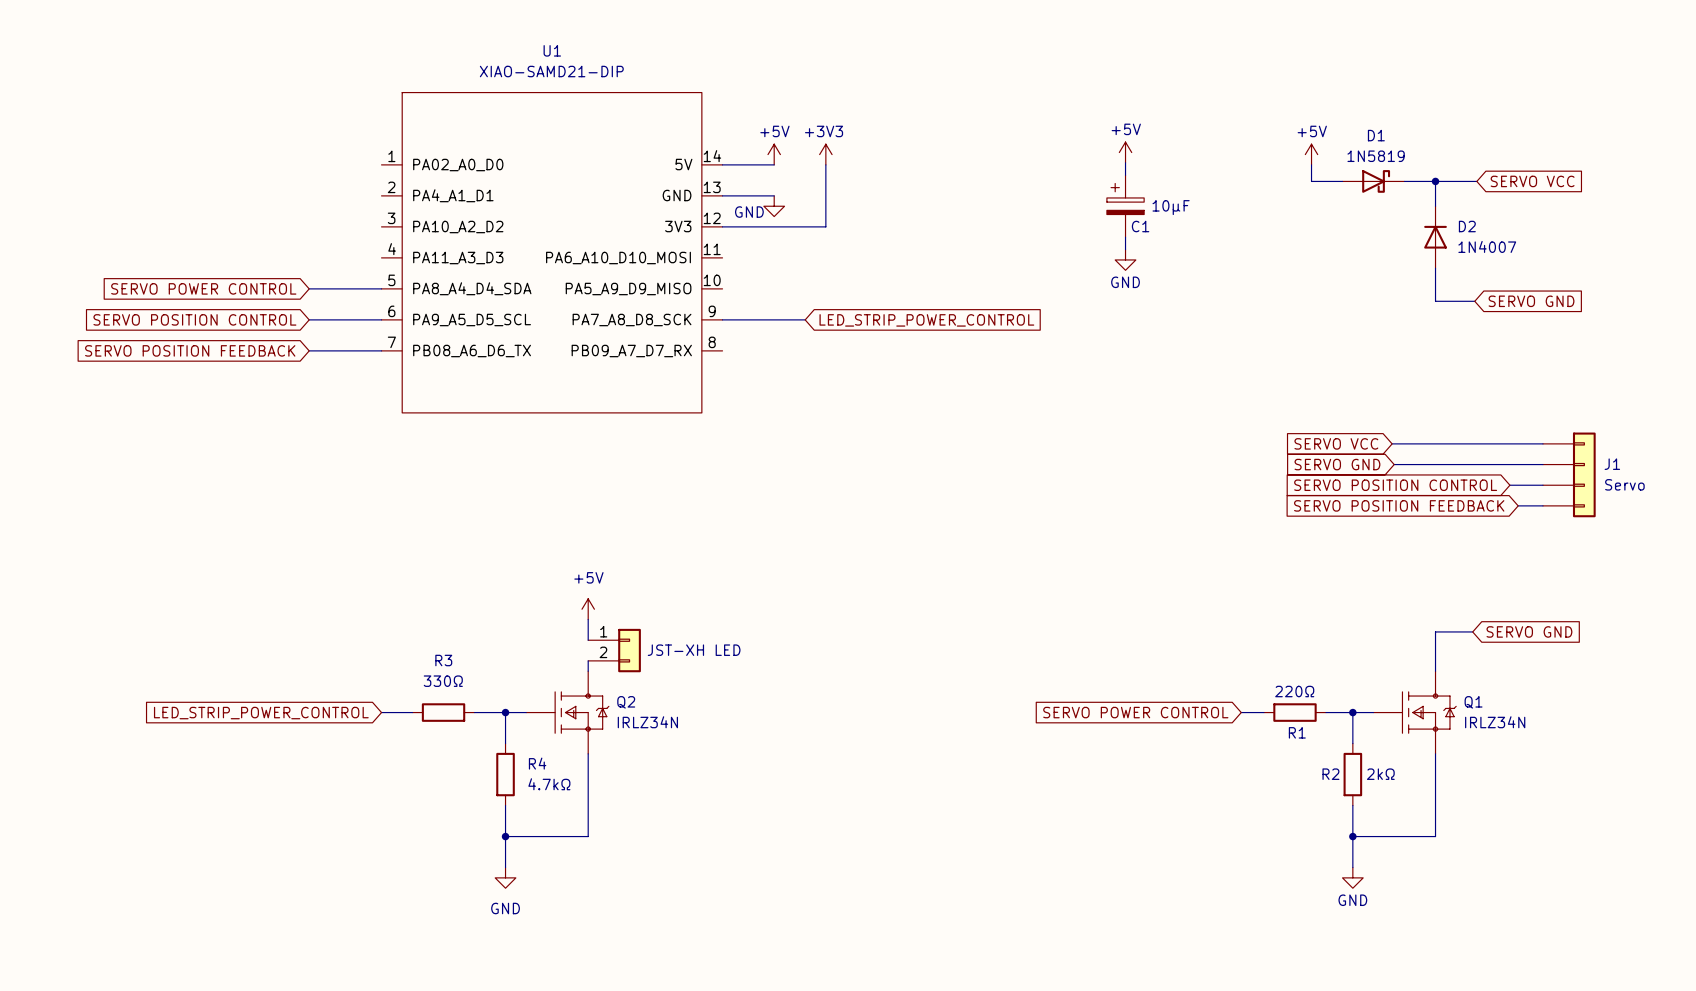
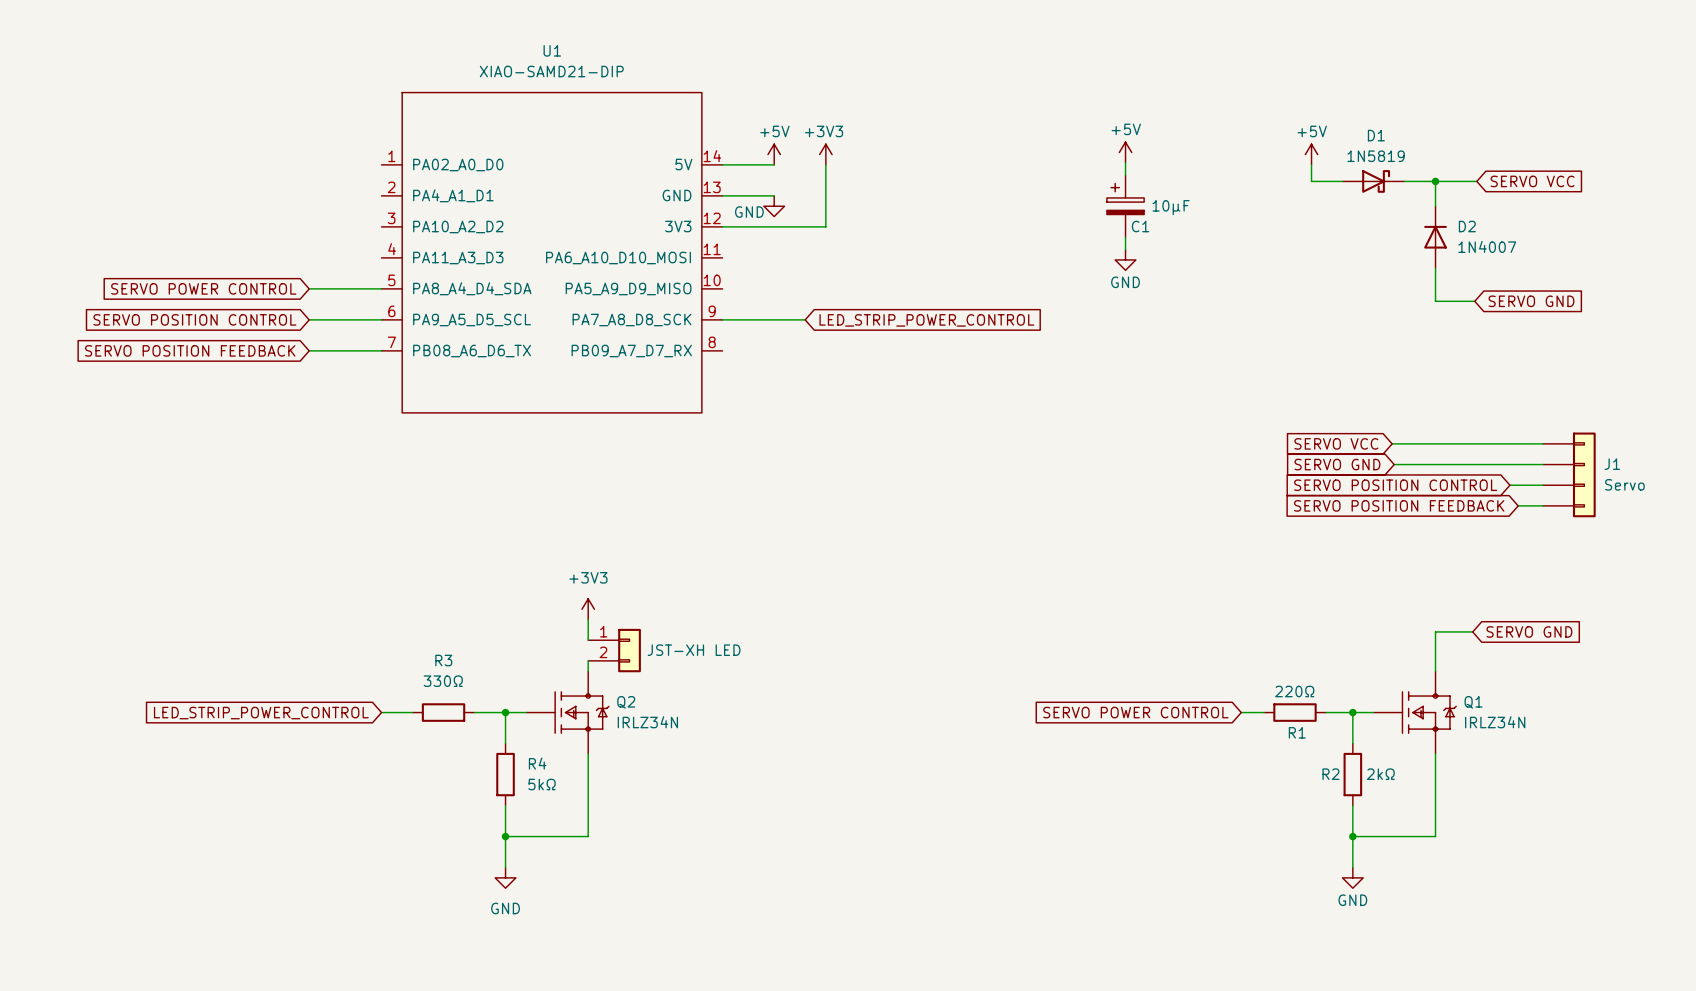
power symbol: +5V (588, 609) -> +3V3 (588, 609)
R4 value: 4.7kΩ (549, 784) -> 5kΩ (542, 784)

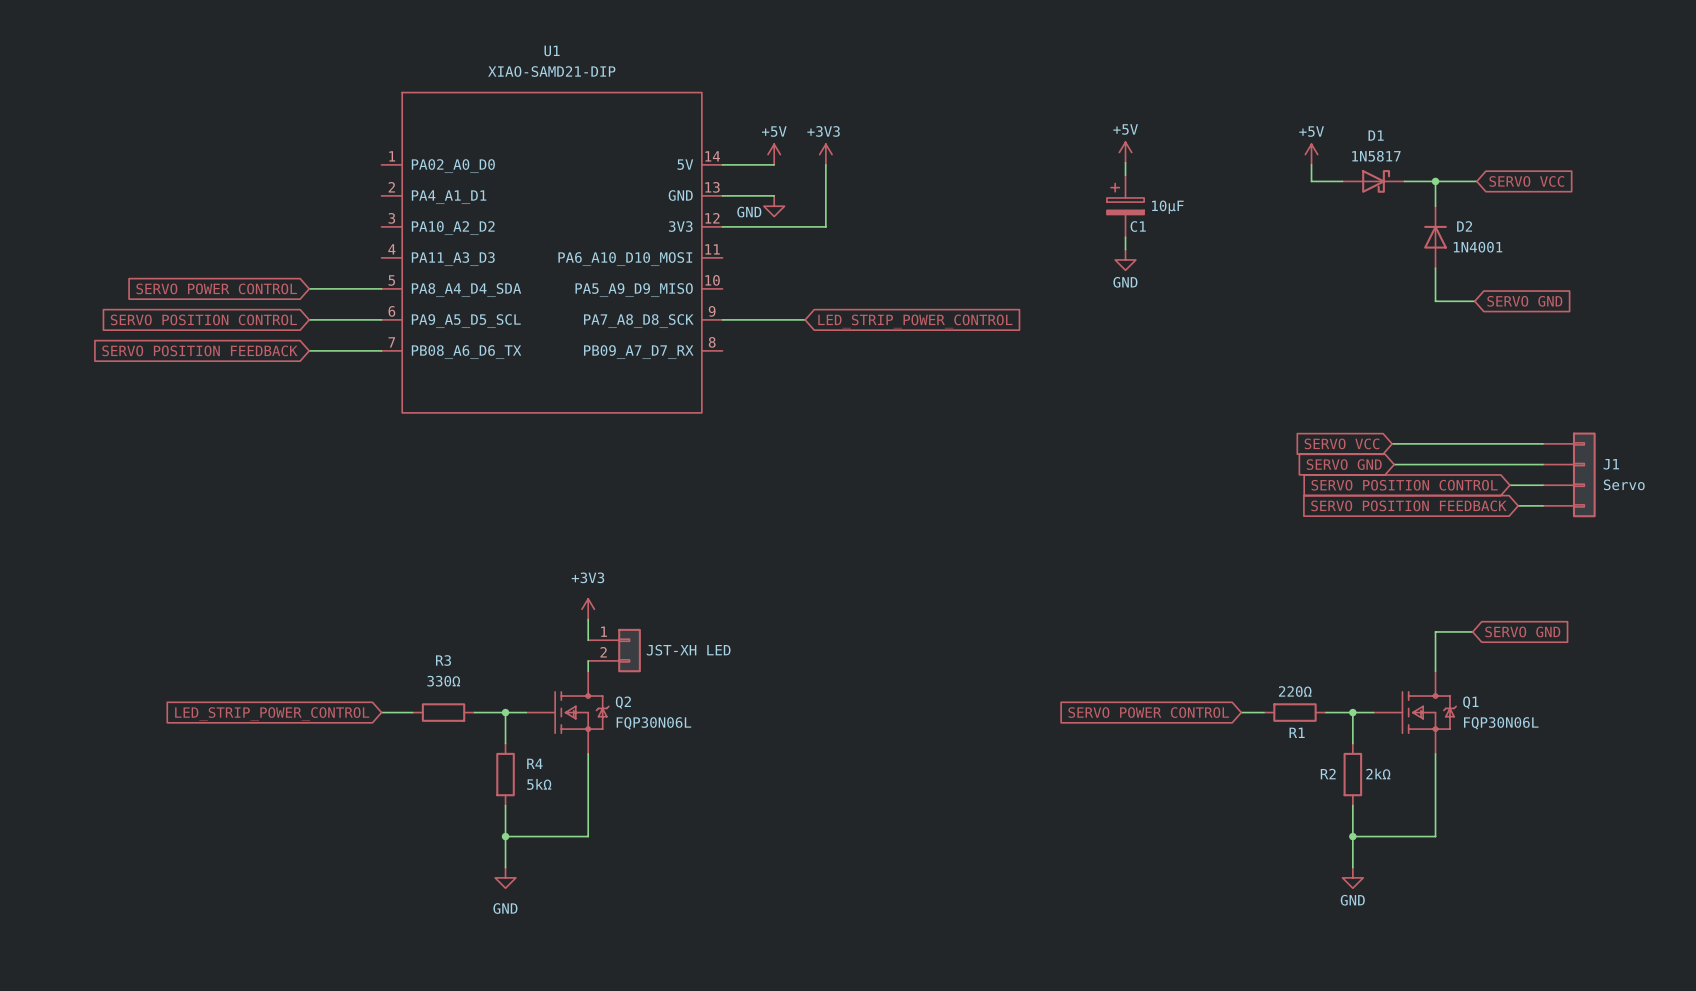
D1 value: 1N5819 (1376, 156) -> 1N5817 (1376, 156)
D2 value: 1N4007 (1487, 246) -> 1N4001 (1478, 247)
Q2 value: IRLZ34N (647, 722) -> FQP30N06L (653, 723)
Q1 value: IRLZ34N (1495, 722) -> FQP30N06L (1501, 723)

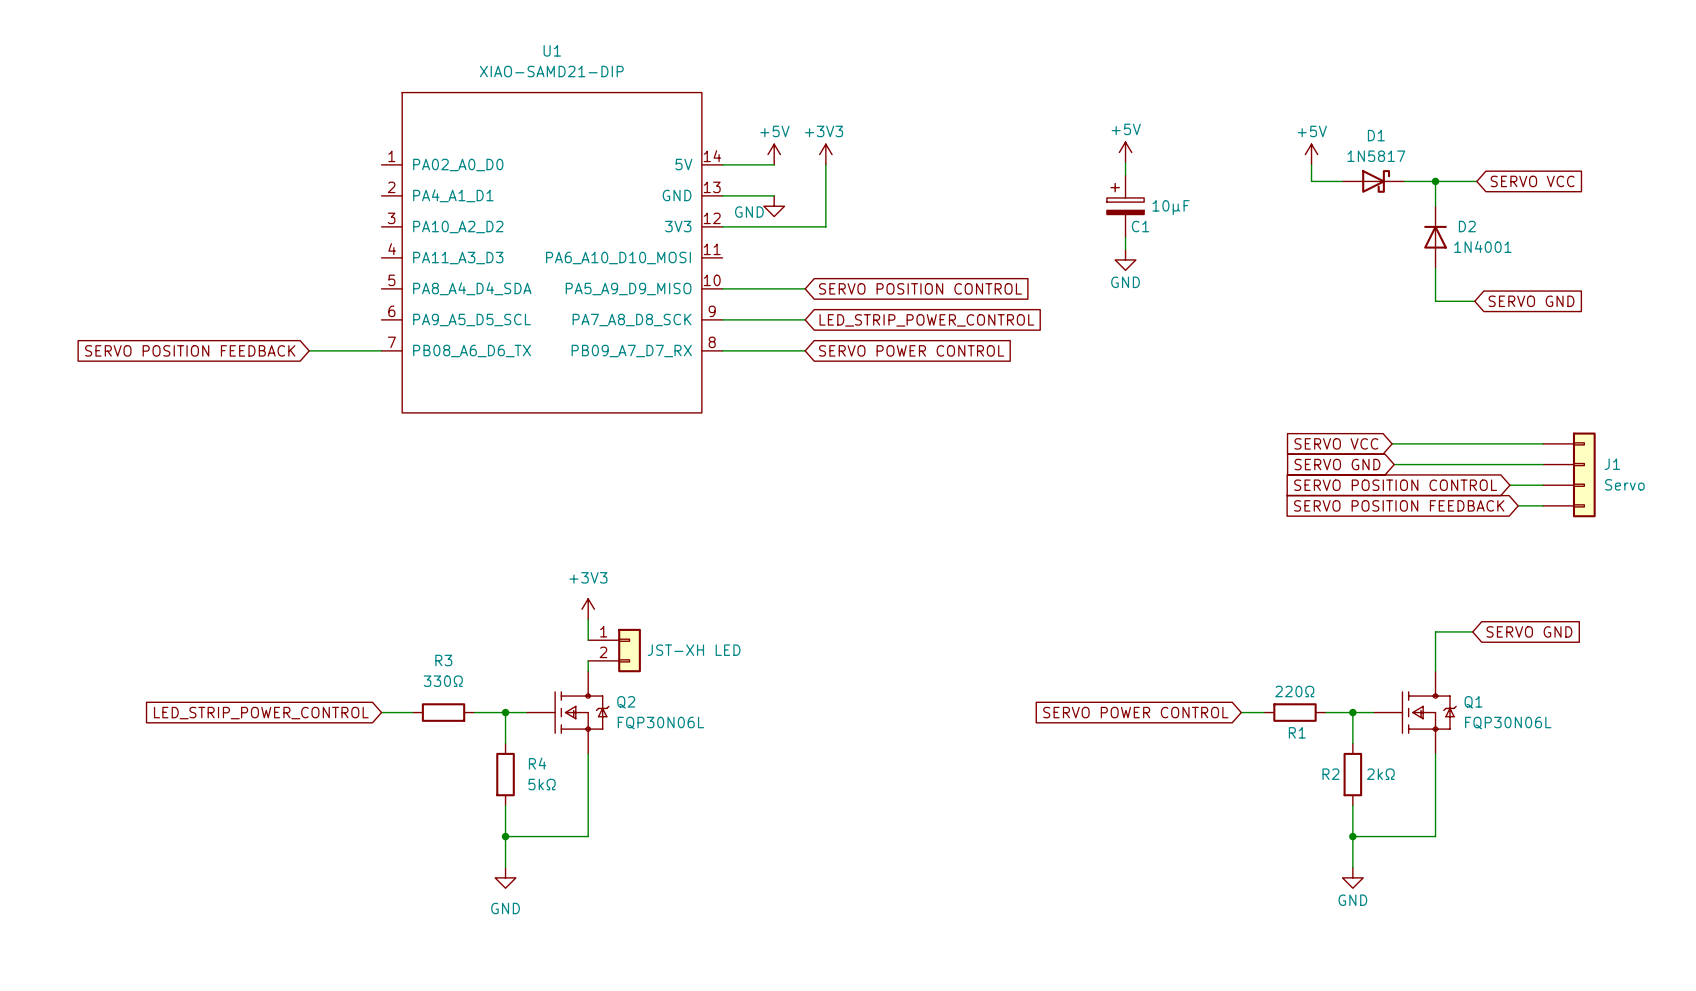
global label: SERVO POWER CONTROL (216, 288) -> none
wire: (309, 288) (381, 288) -> none
wire: none -> (722, 288) (805, 288)
global label: none -> SERVO POSITION CONTROL (920, 288)
global label: SERVO POSITION CONTROL (203, 319) -> none
wire: (309, 319) (381, 319) -> none
wire: none -> (722, 350) (805, 350)
global label: none -> SERVO POWER CONTROL (911, 350)

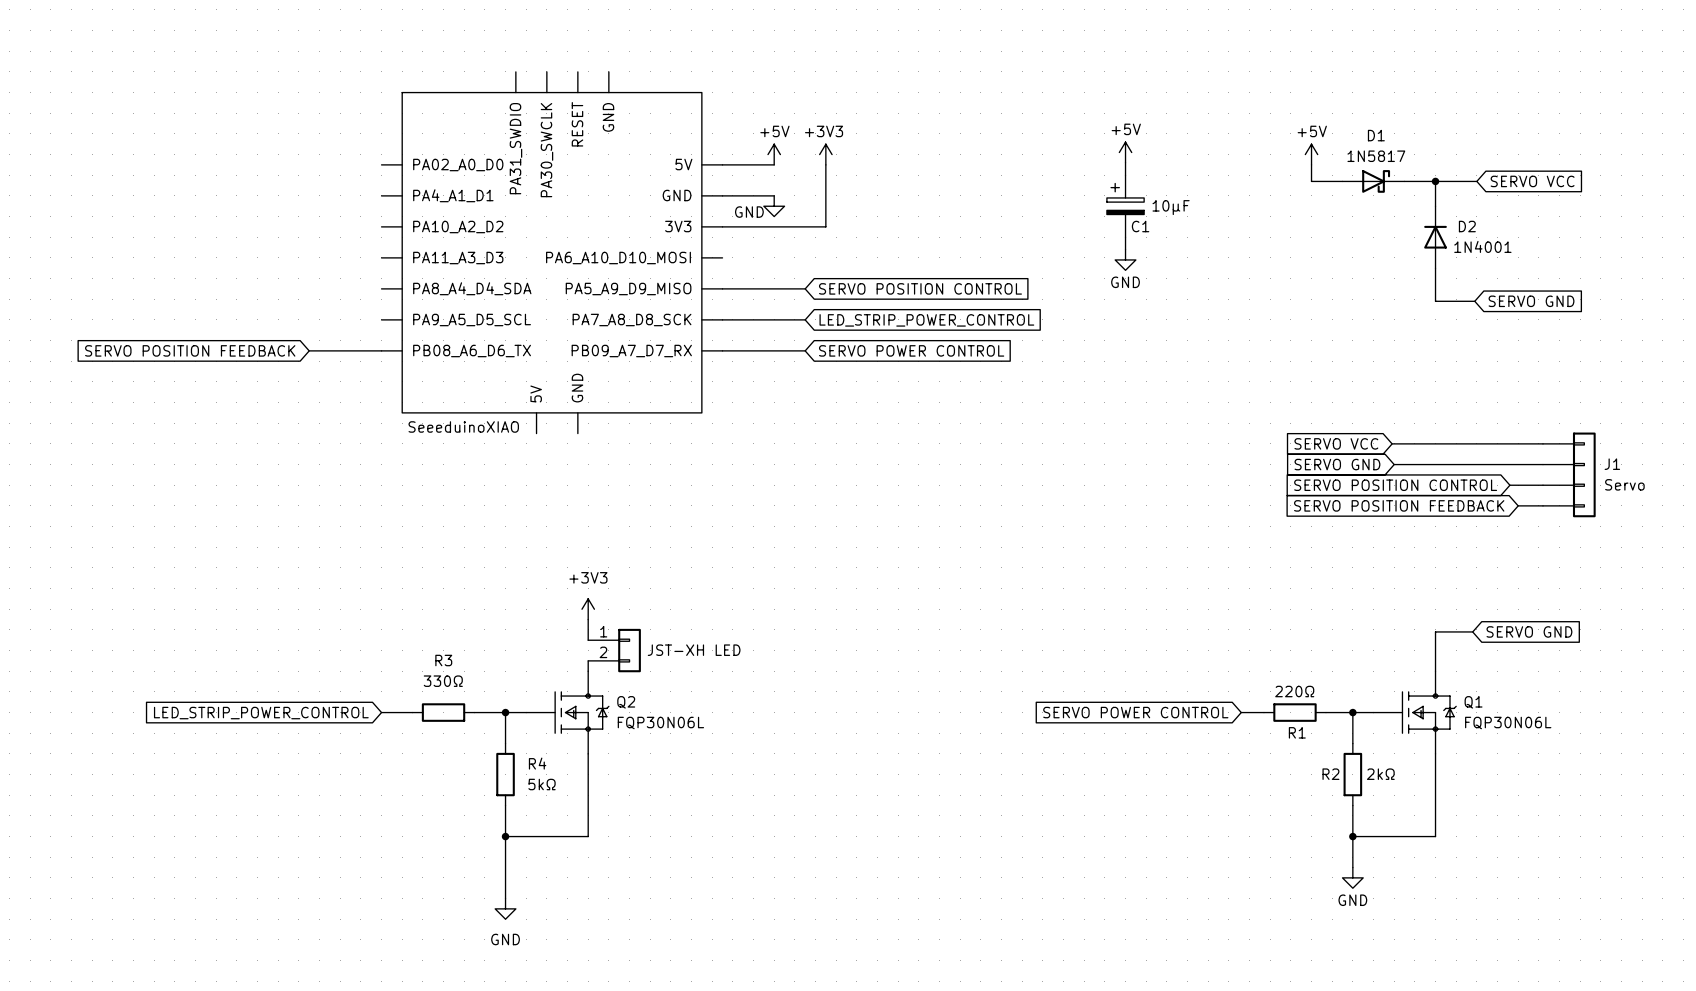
U1: XIAO-SAMD21-DIP (552, 252) -> none
part: none -> SeeeduinoXIAO (552, 252)
wire: none -> (505, 867) (505, 898)
power symbol position: GND (505, 877) -> GND (505, 908)

